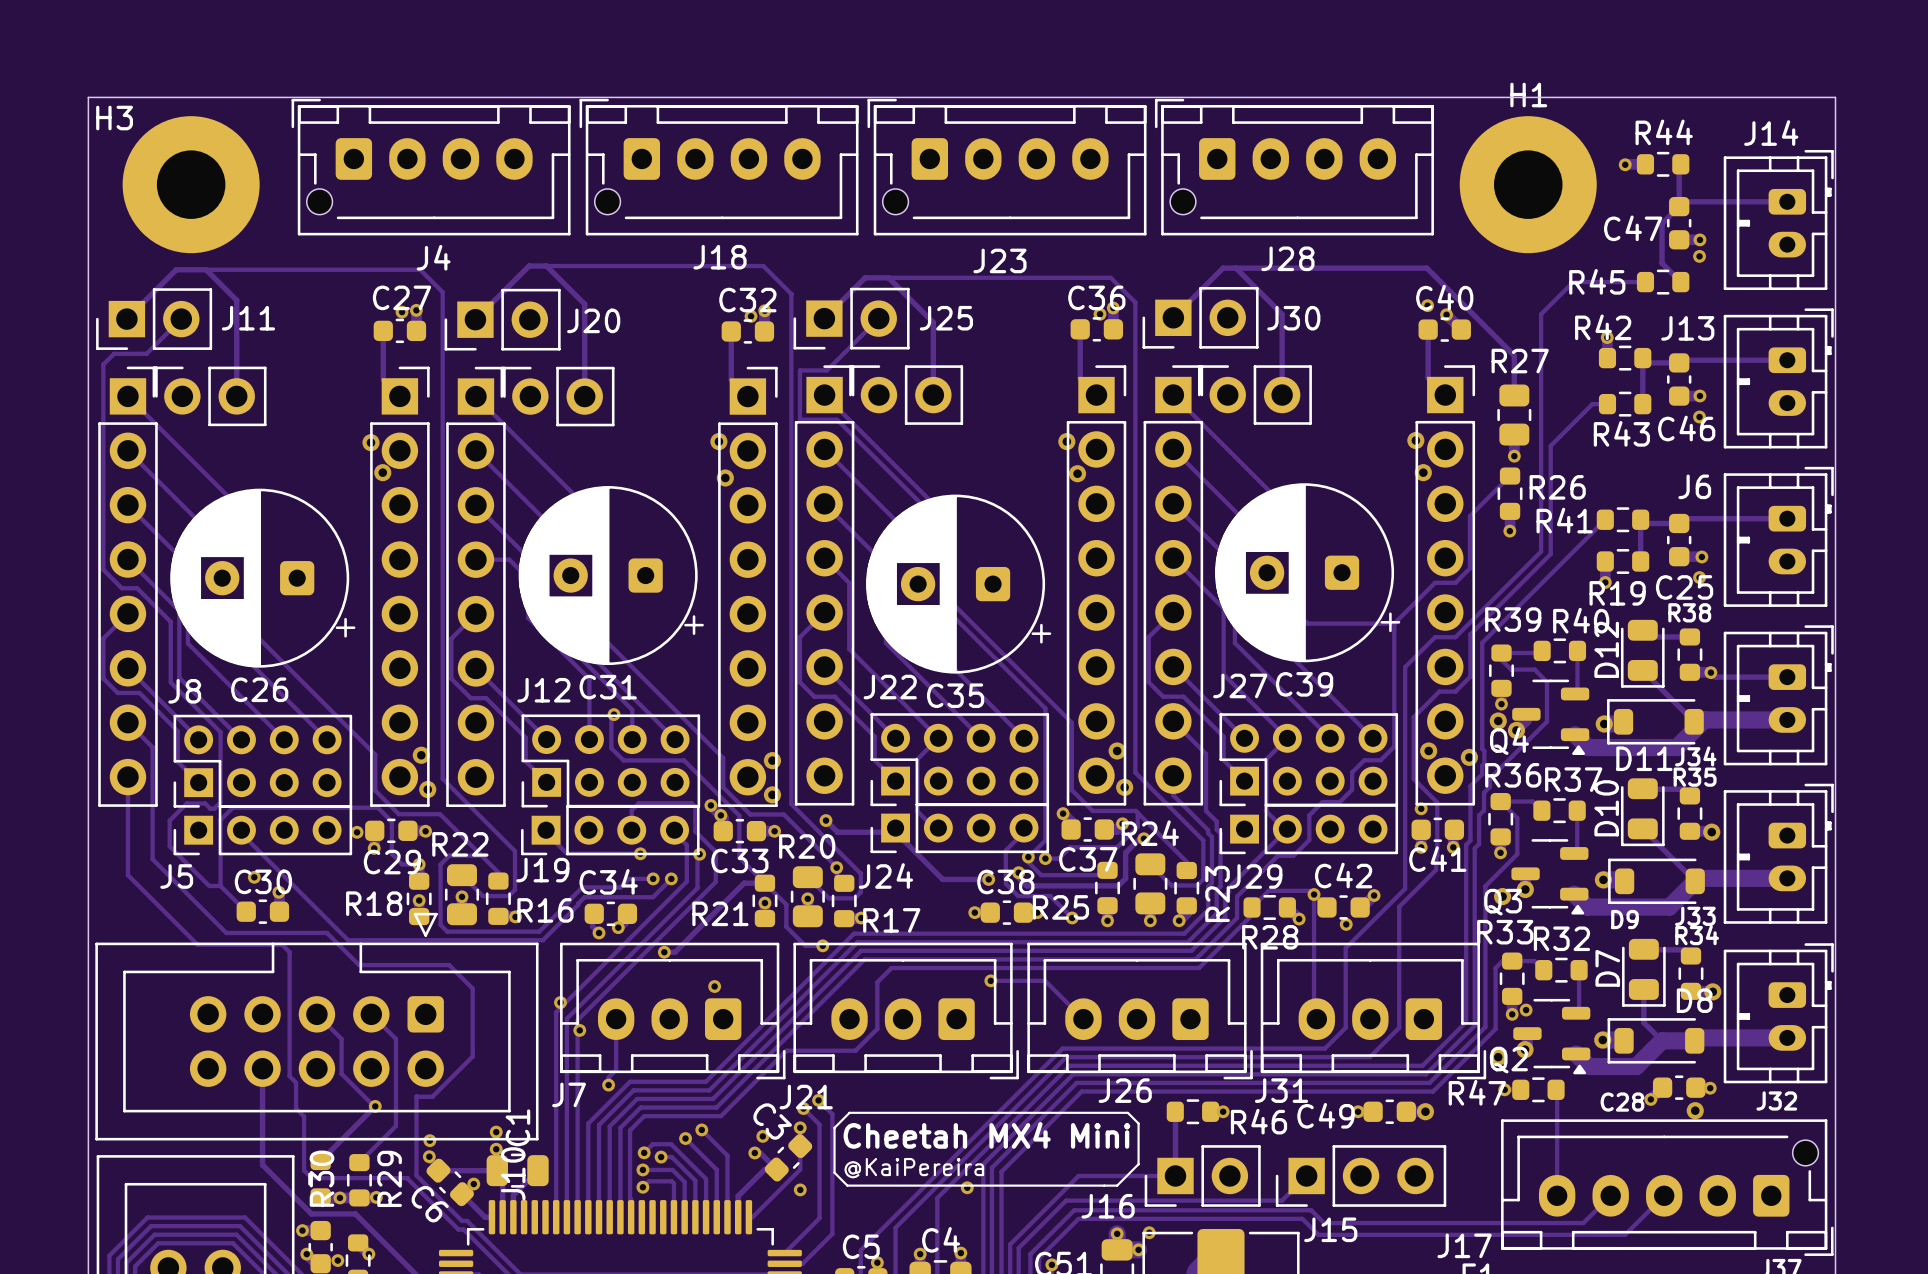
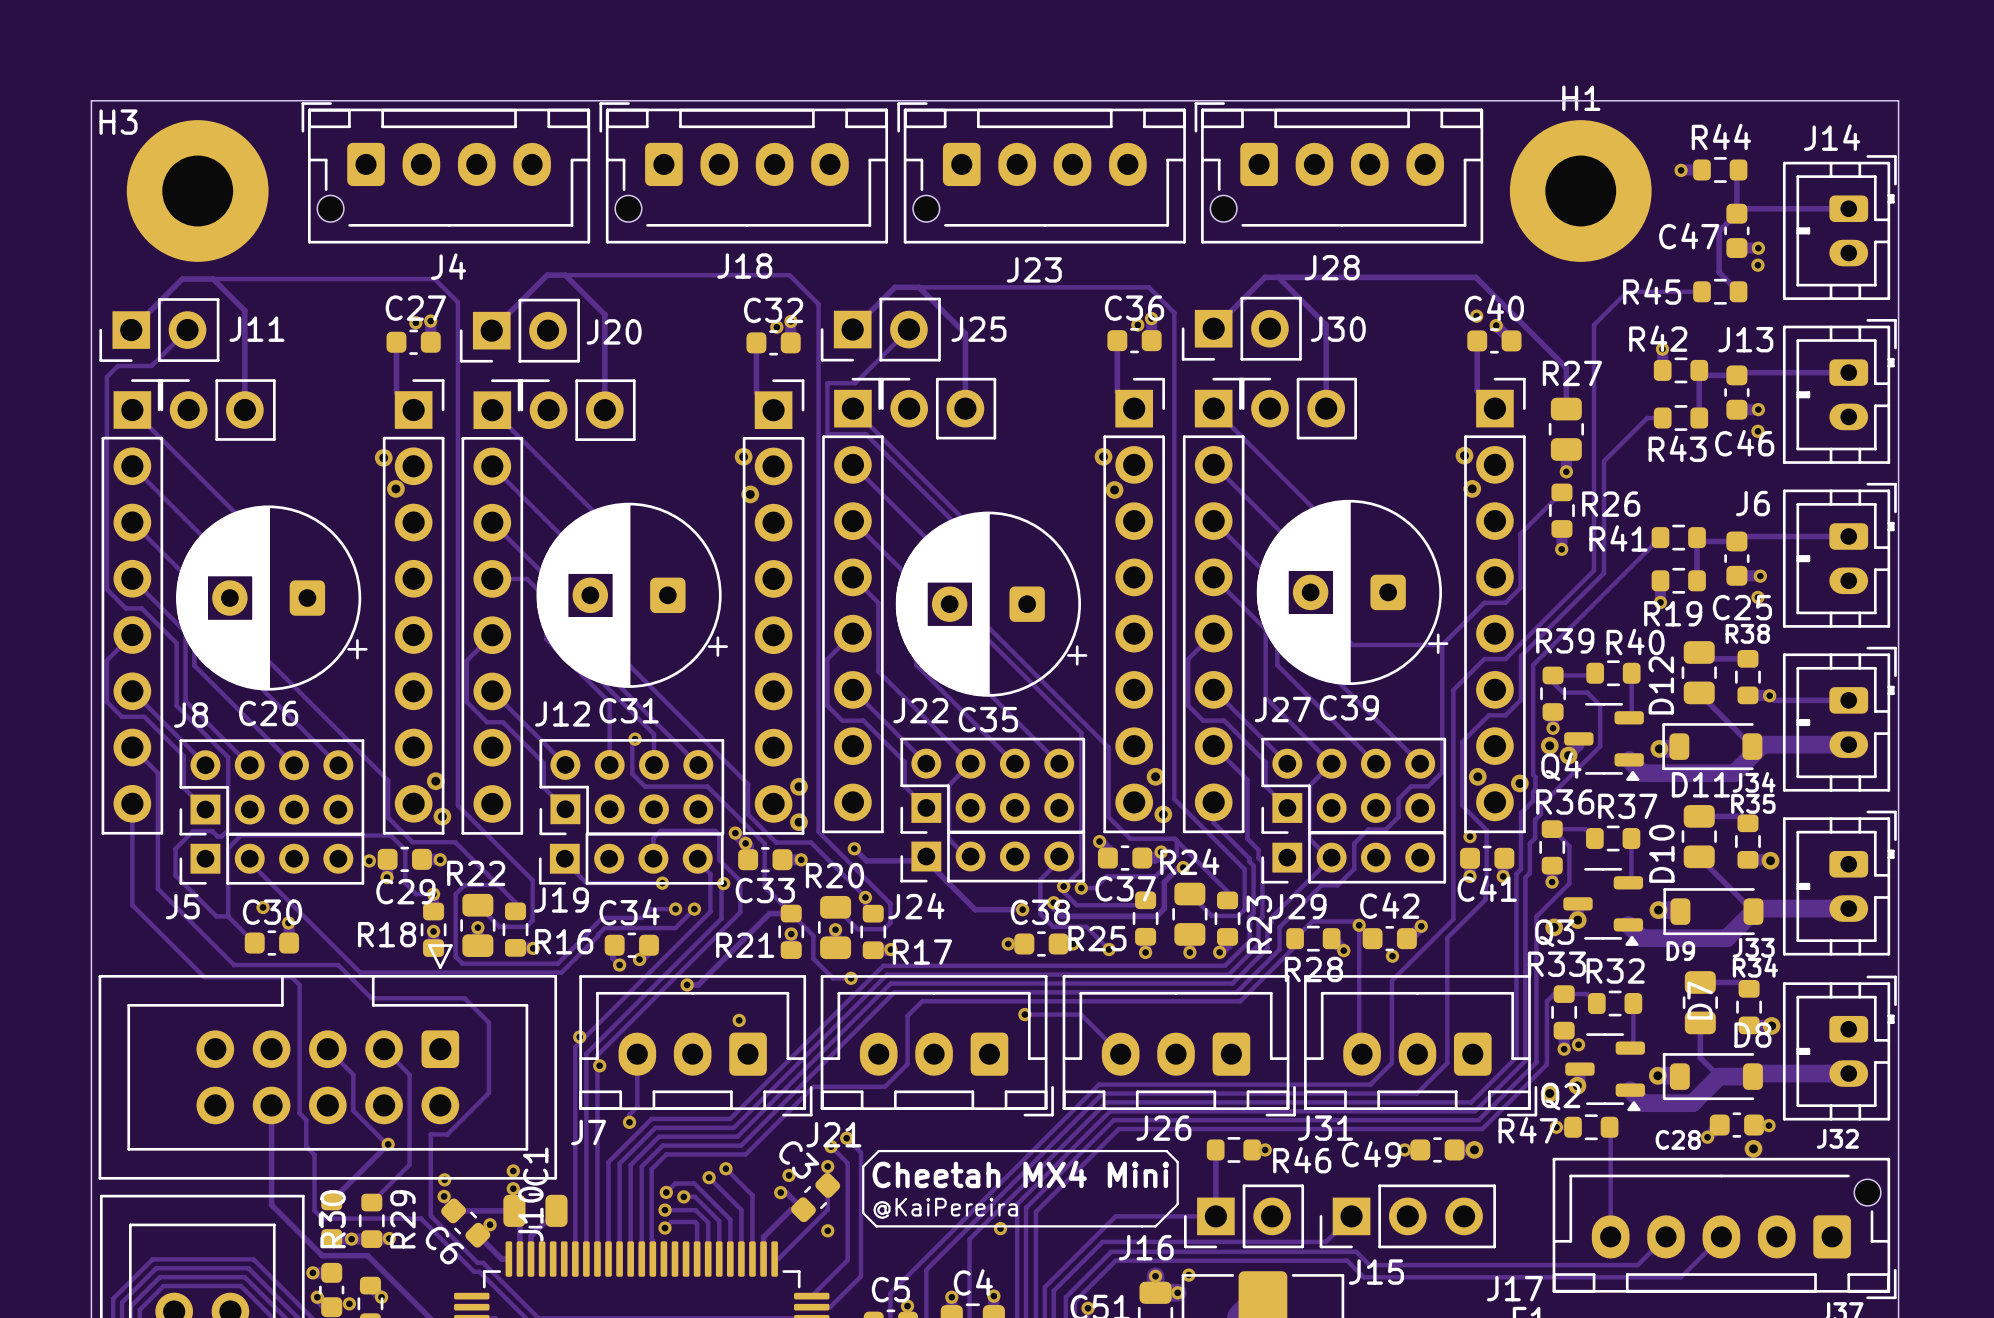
D12 footprint: [1620, 619, 1665, 688] -> [1681, 641, 1717, 705]
D10 footprint: [1620, 778, 1665, 847] -> [1681, 805, 1717, 869]
D7 footprint: [1622, 938, 1666, 1007] -> [1682, 971, 1718, 1035]

